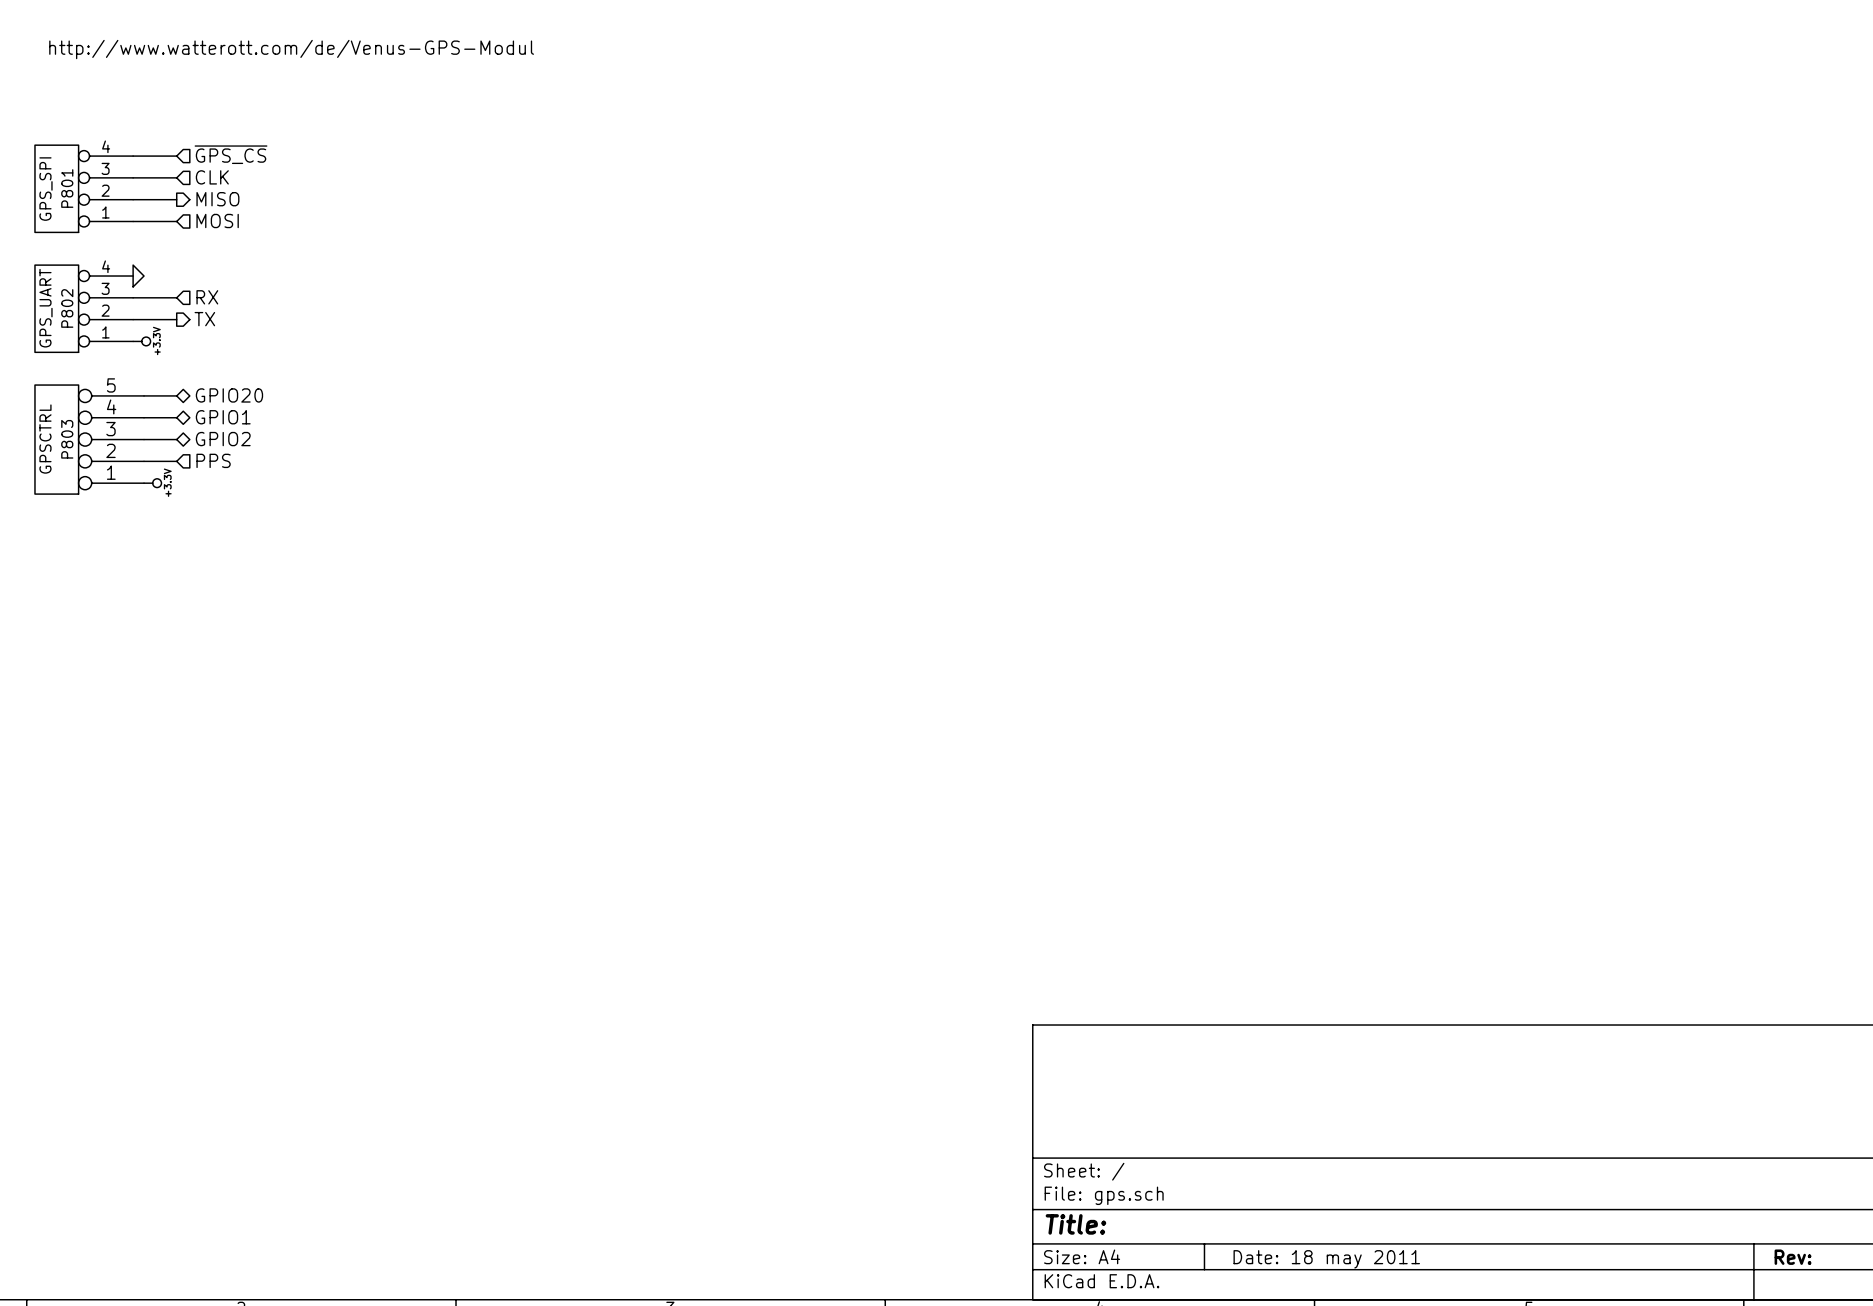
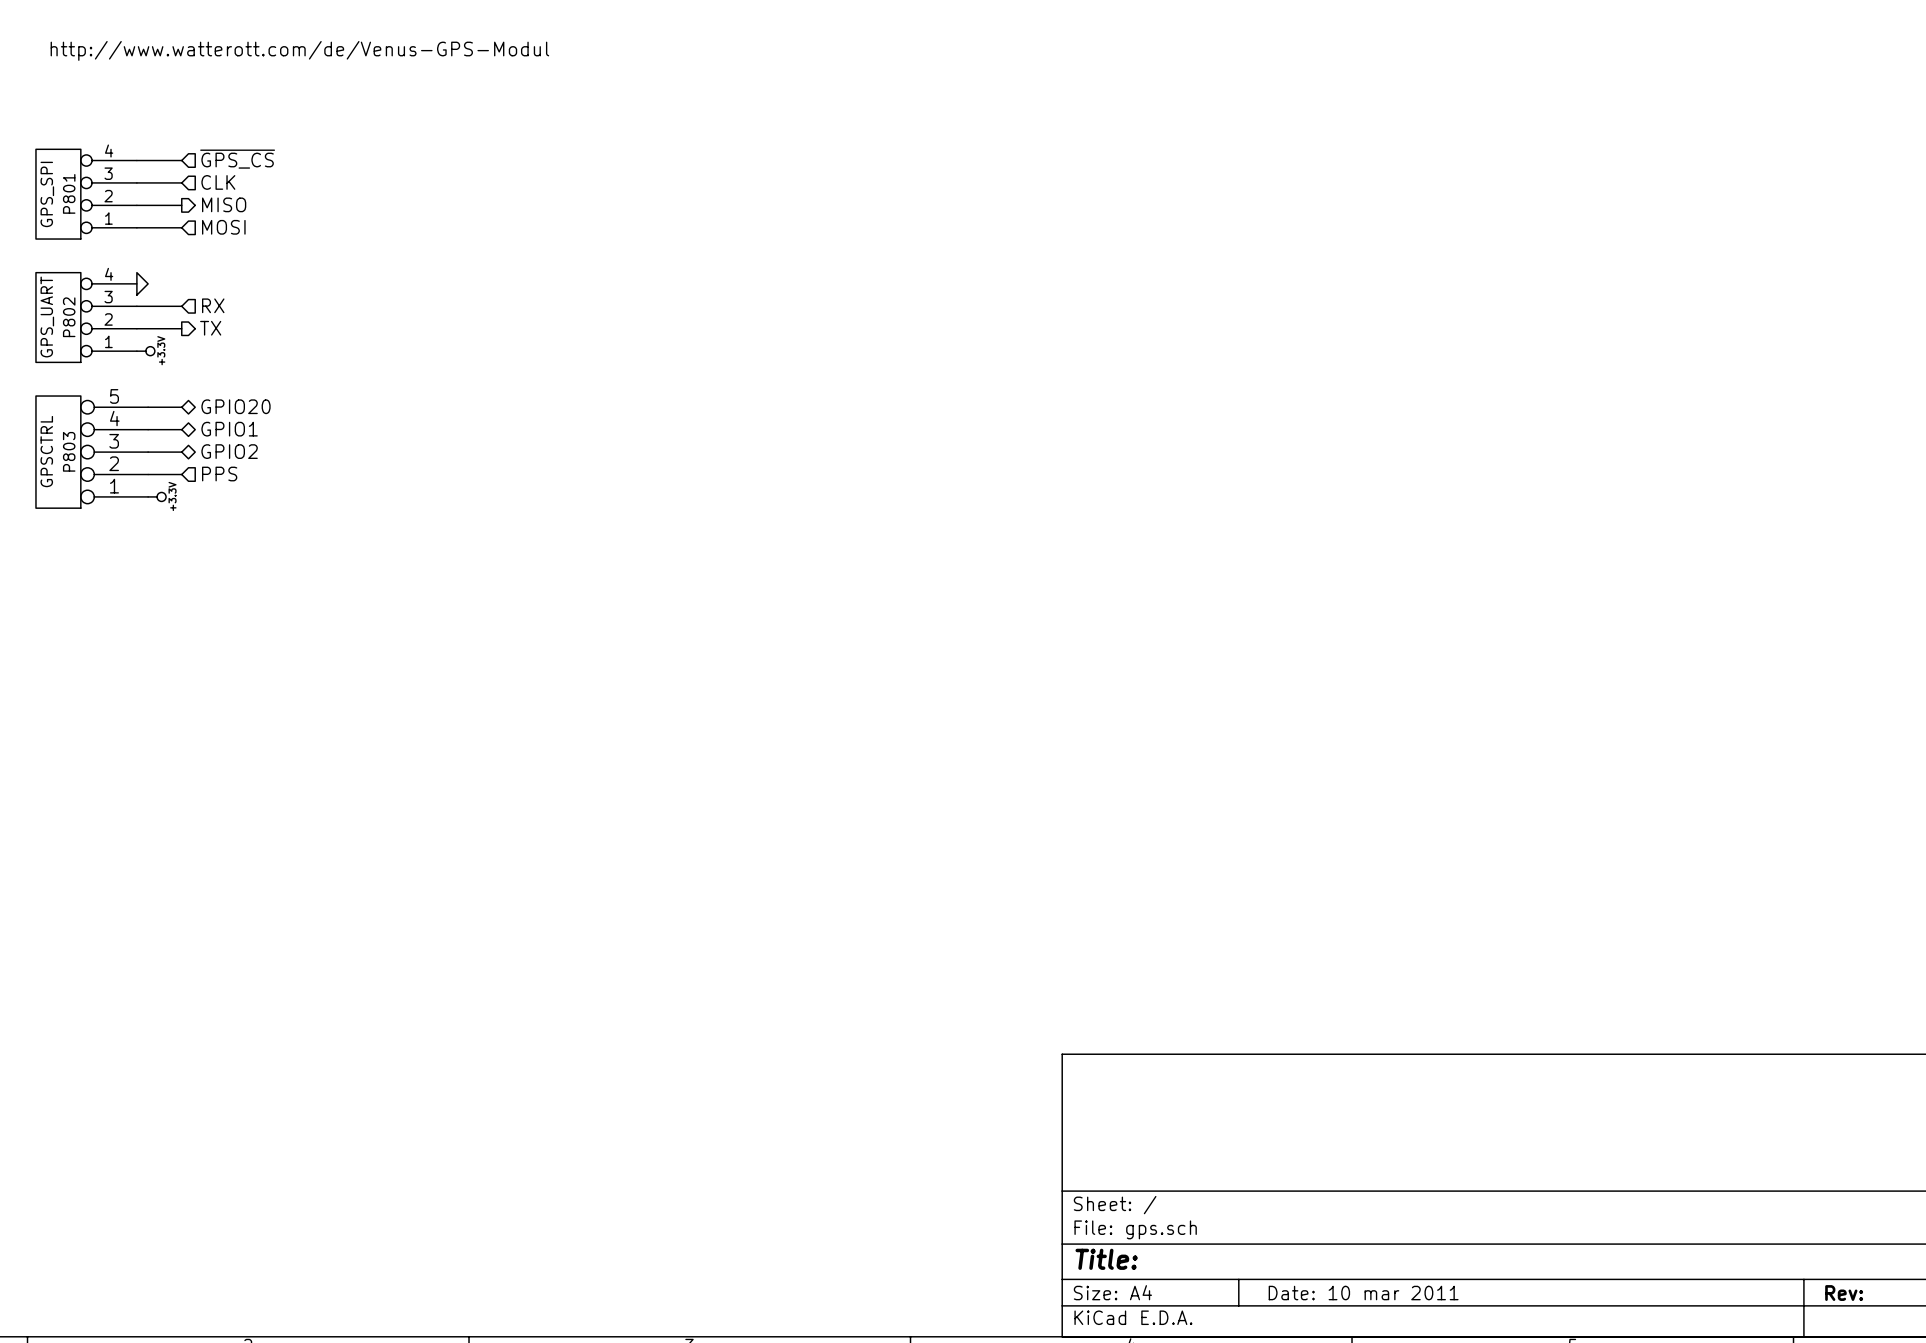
title block: Date: 18 may 2011 (1326, 1259) -> Date: 10 mar 2011 (1363, 1293)

